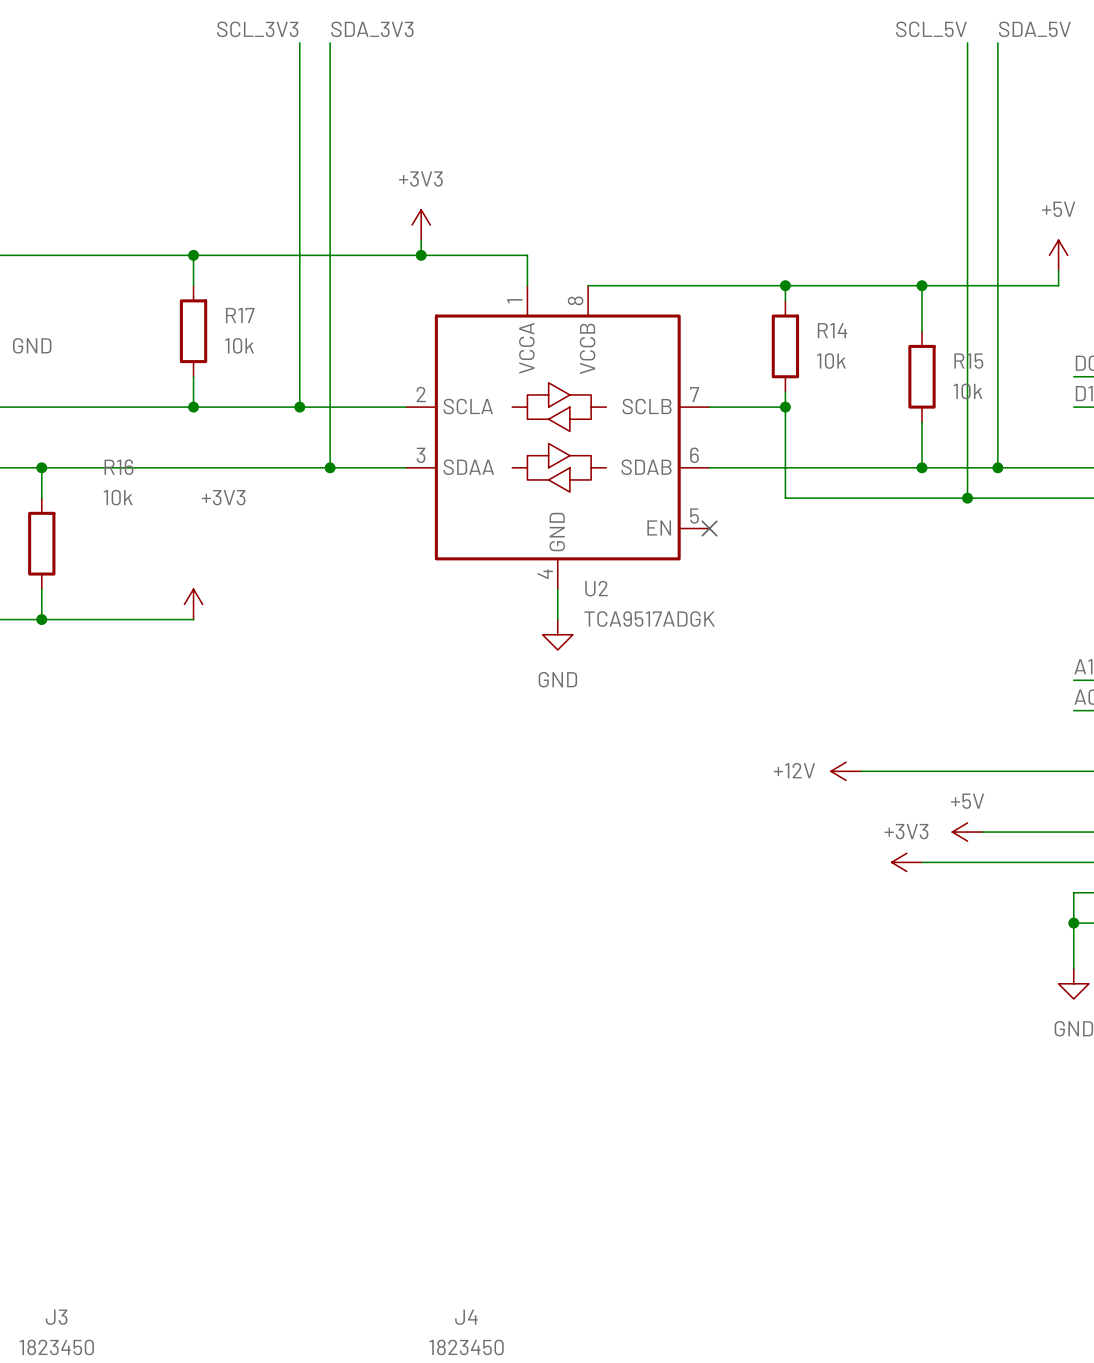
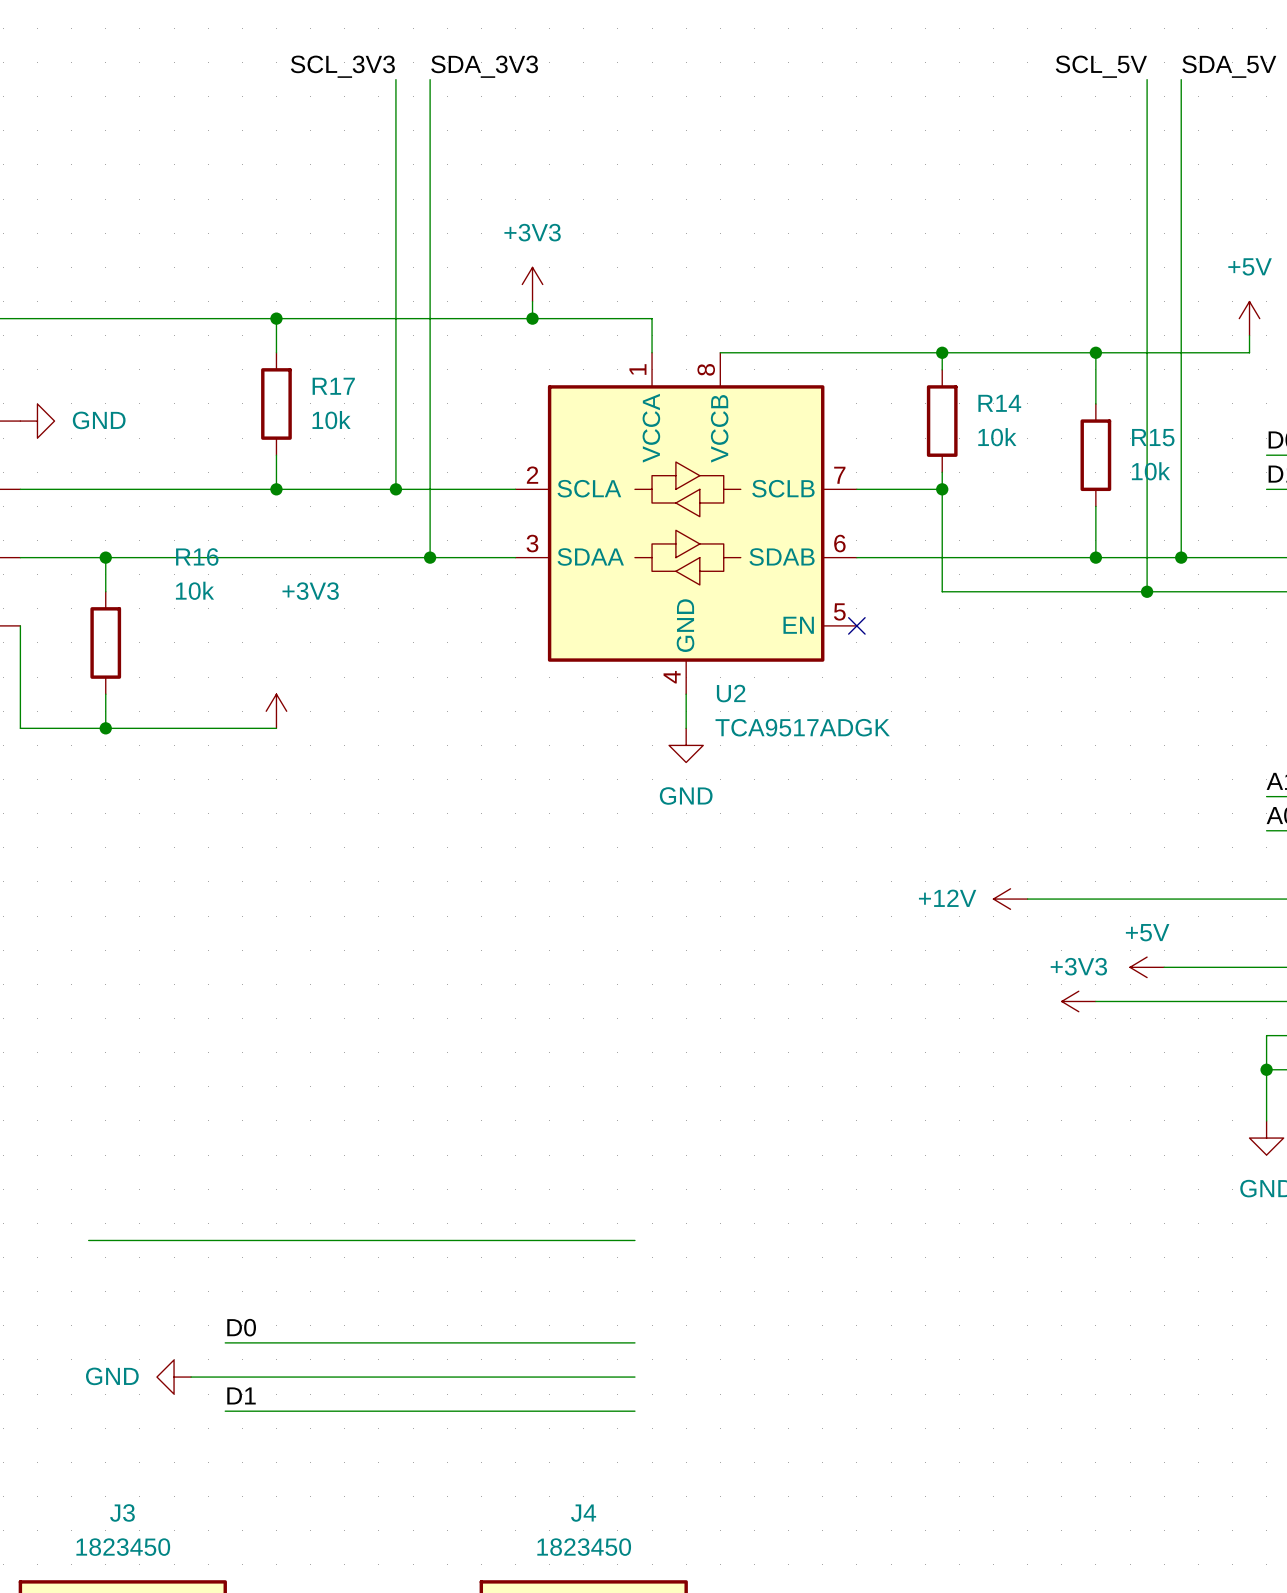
wire: none -> (88, 1240) (634, 1240)
label: none -> D0 (241, 1327)
wire: none -> (225, 1342) (634, 1342)
power symbol: none -> GND (174, 1377)
wire: none -> (191, 1377) (634, 1377)
label: none -> D1 (241, 1395)
wire: none -> (225, 1411) (634, 1411)

